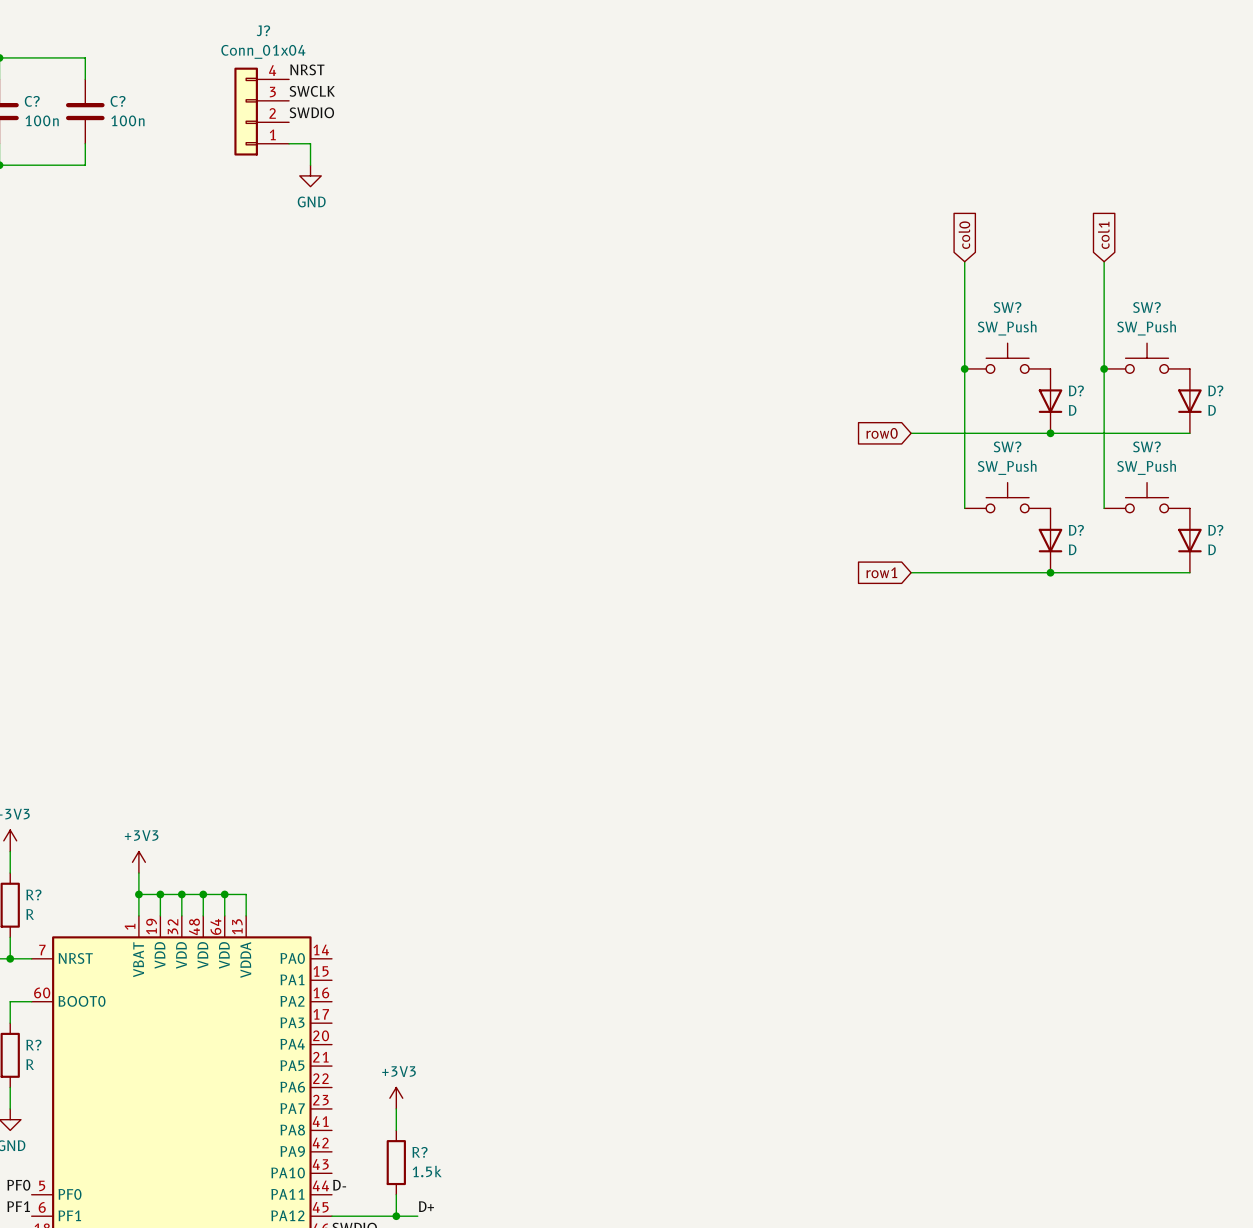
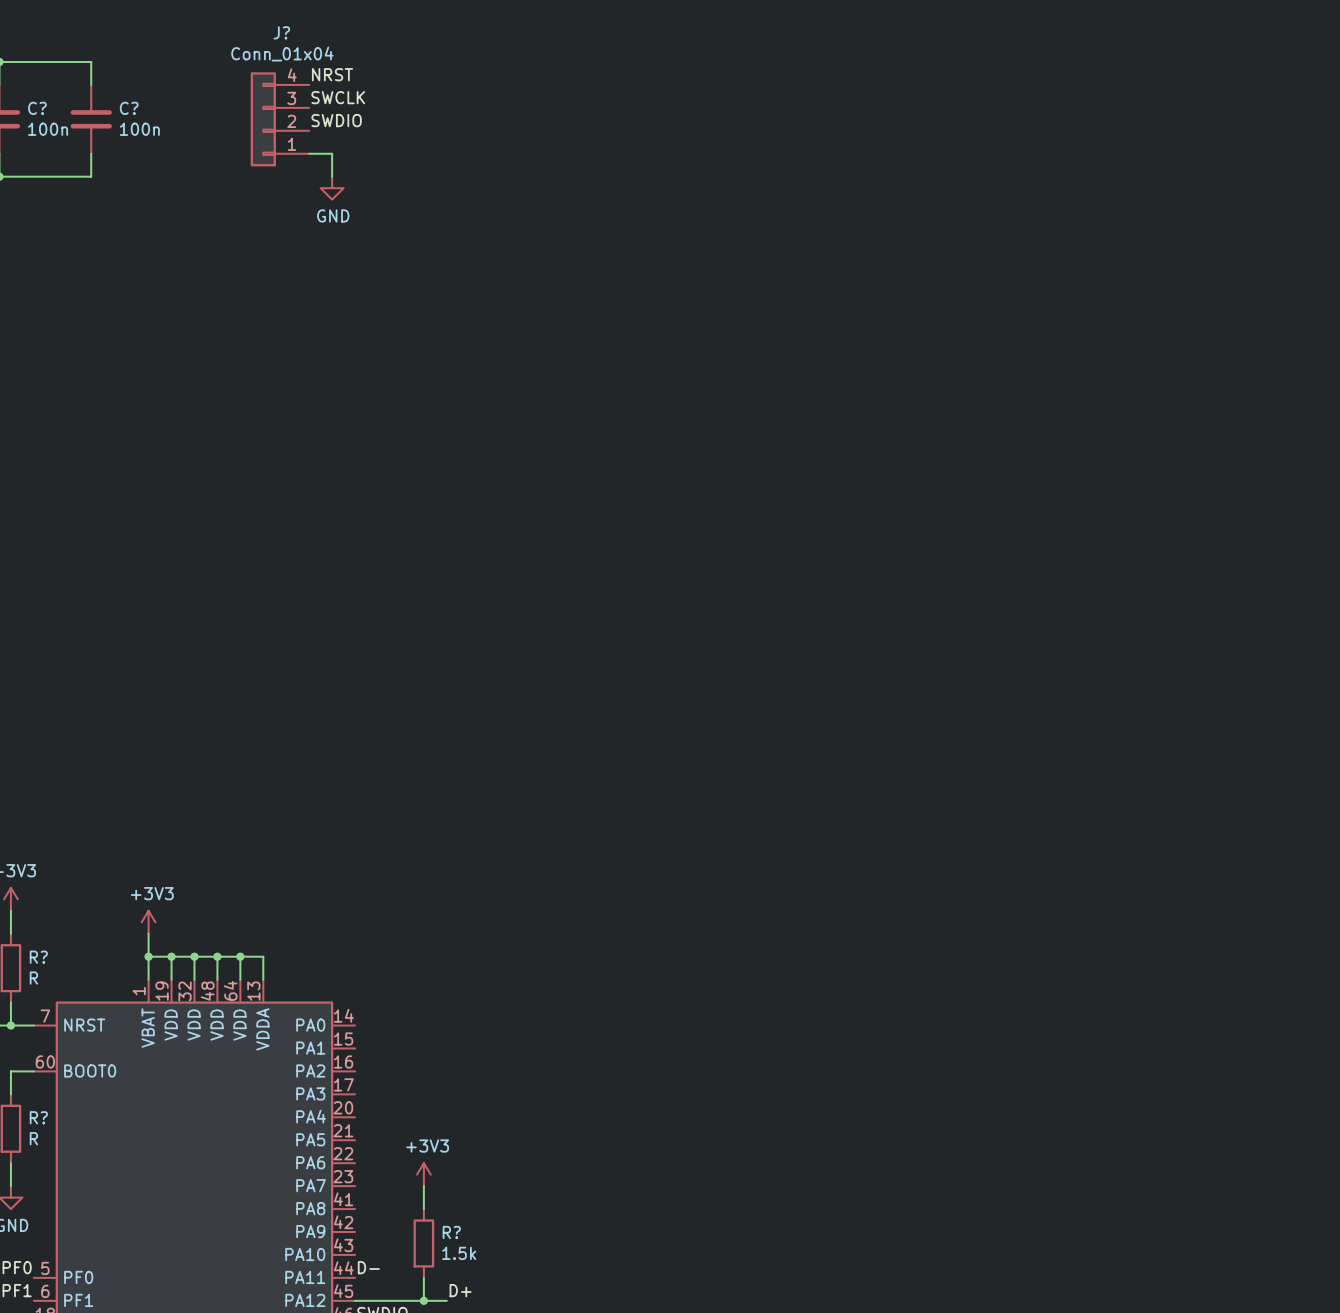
global label: col0 (964, 235) -> none
global label: col1 (1103, 235) -> none
wire: (964, 261) (964, 508) -> none
wire: (1104, 261) (1104, 508) -> none
SW?: SW_Push (1007, 358) -> none
SW?: SW_Push (1147, 358) -> none
junction: (964, 368) -> none
junction: (1104, 368) -> none
D?: D (1050, 401) -> none
D?: D (1189, 401) -> none
global label: row0 (882, 433) -> none
wire: (911, 433) (1189, 433) -> none
junction: (1050, 433) -> none
SW?: SW_Push (1007, 497) -> none
SW?: SW_Push (1147, 497) -> none
D?: D (1050, 540) -> none
D?: D (1189, 540) -> none
global label: row1 (881, 572) -> none
wire: (911, 572) (1189, 572) -> none
junction: (1050, 572) -> none

